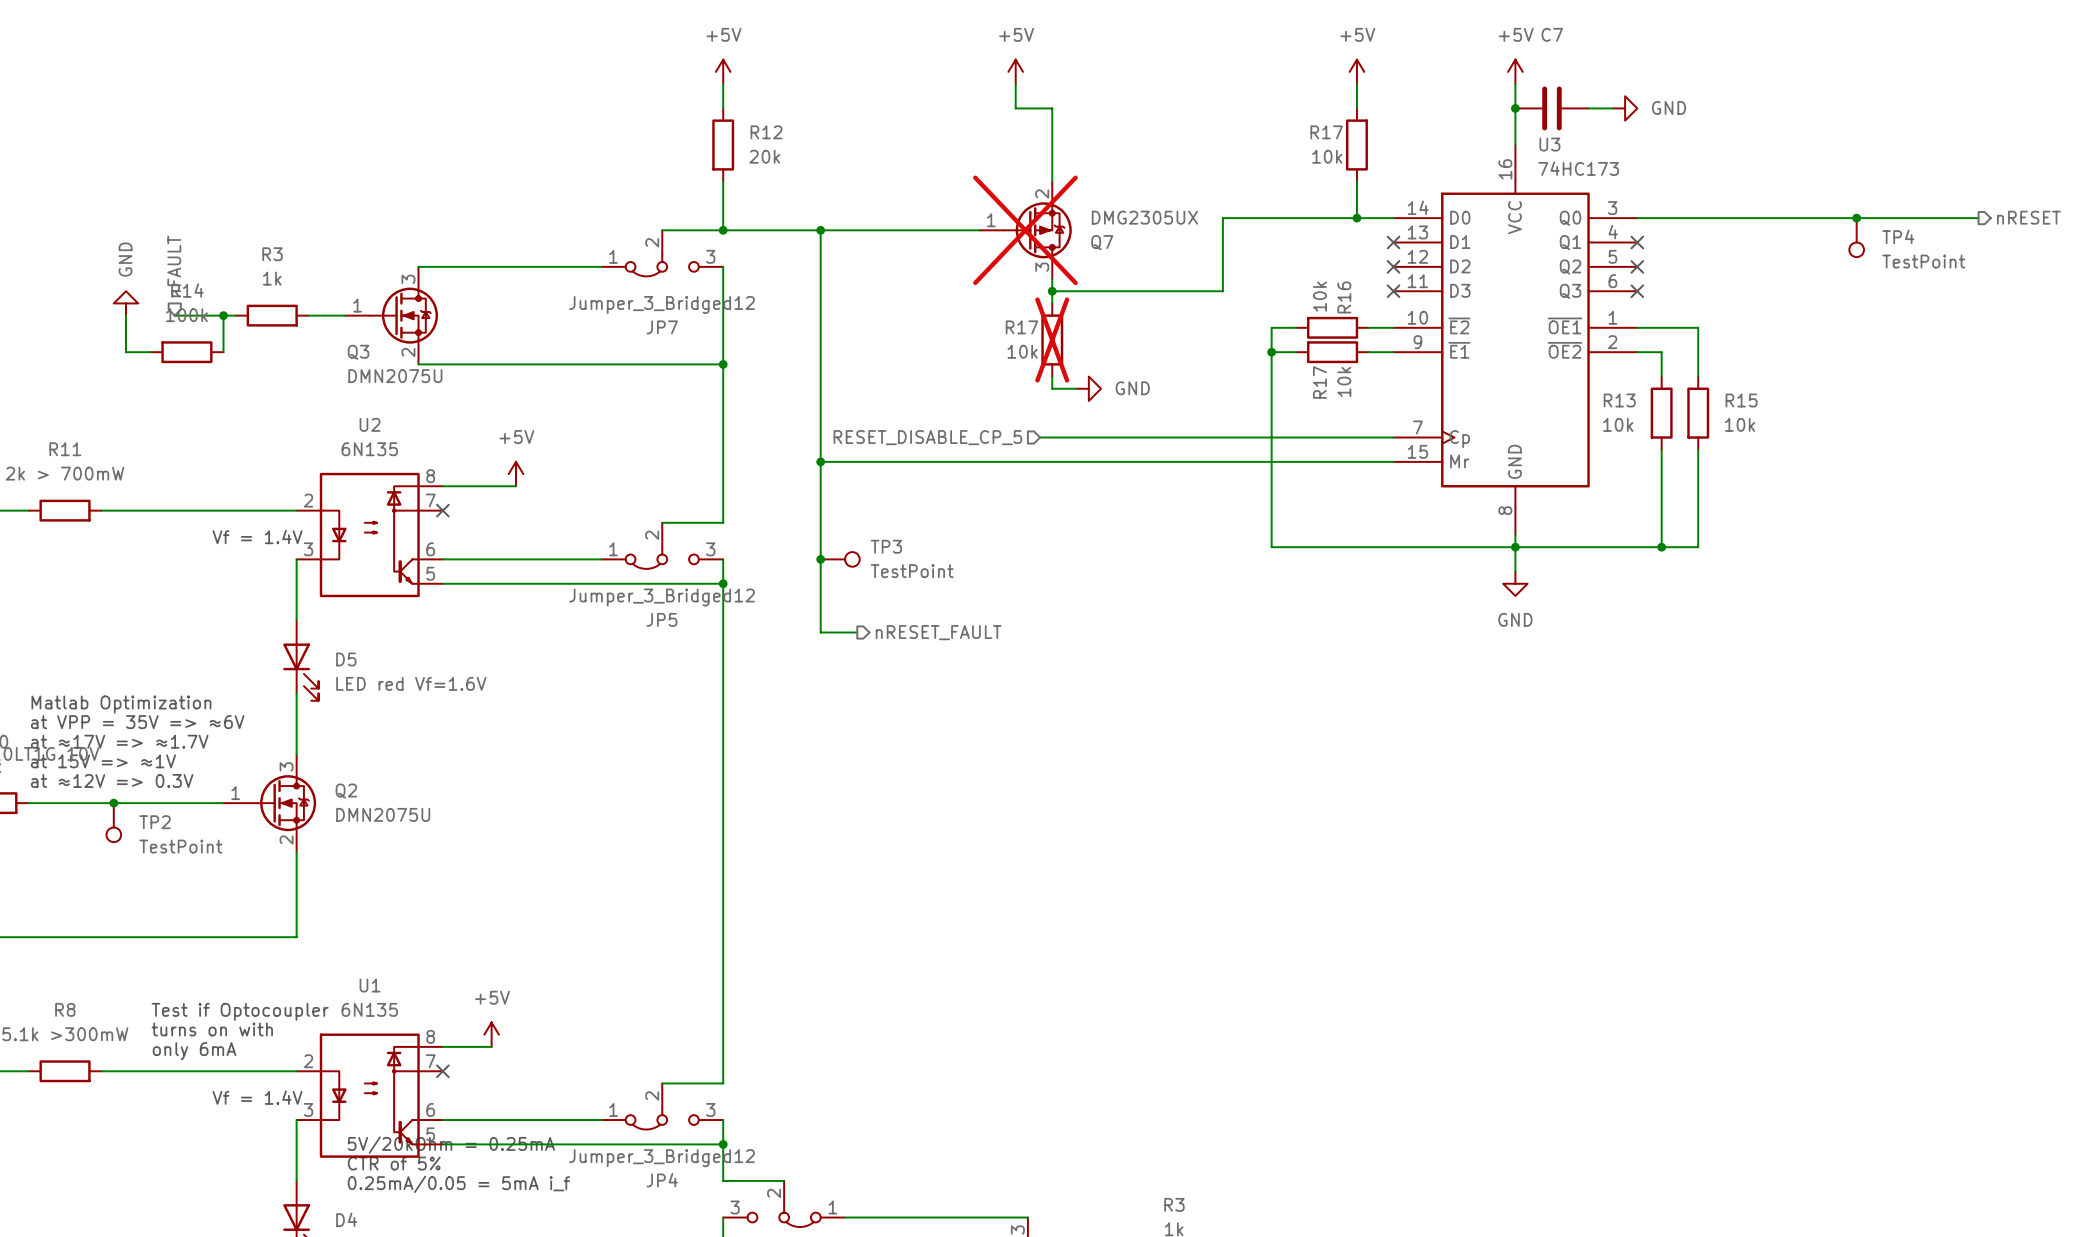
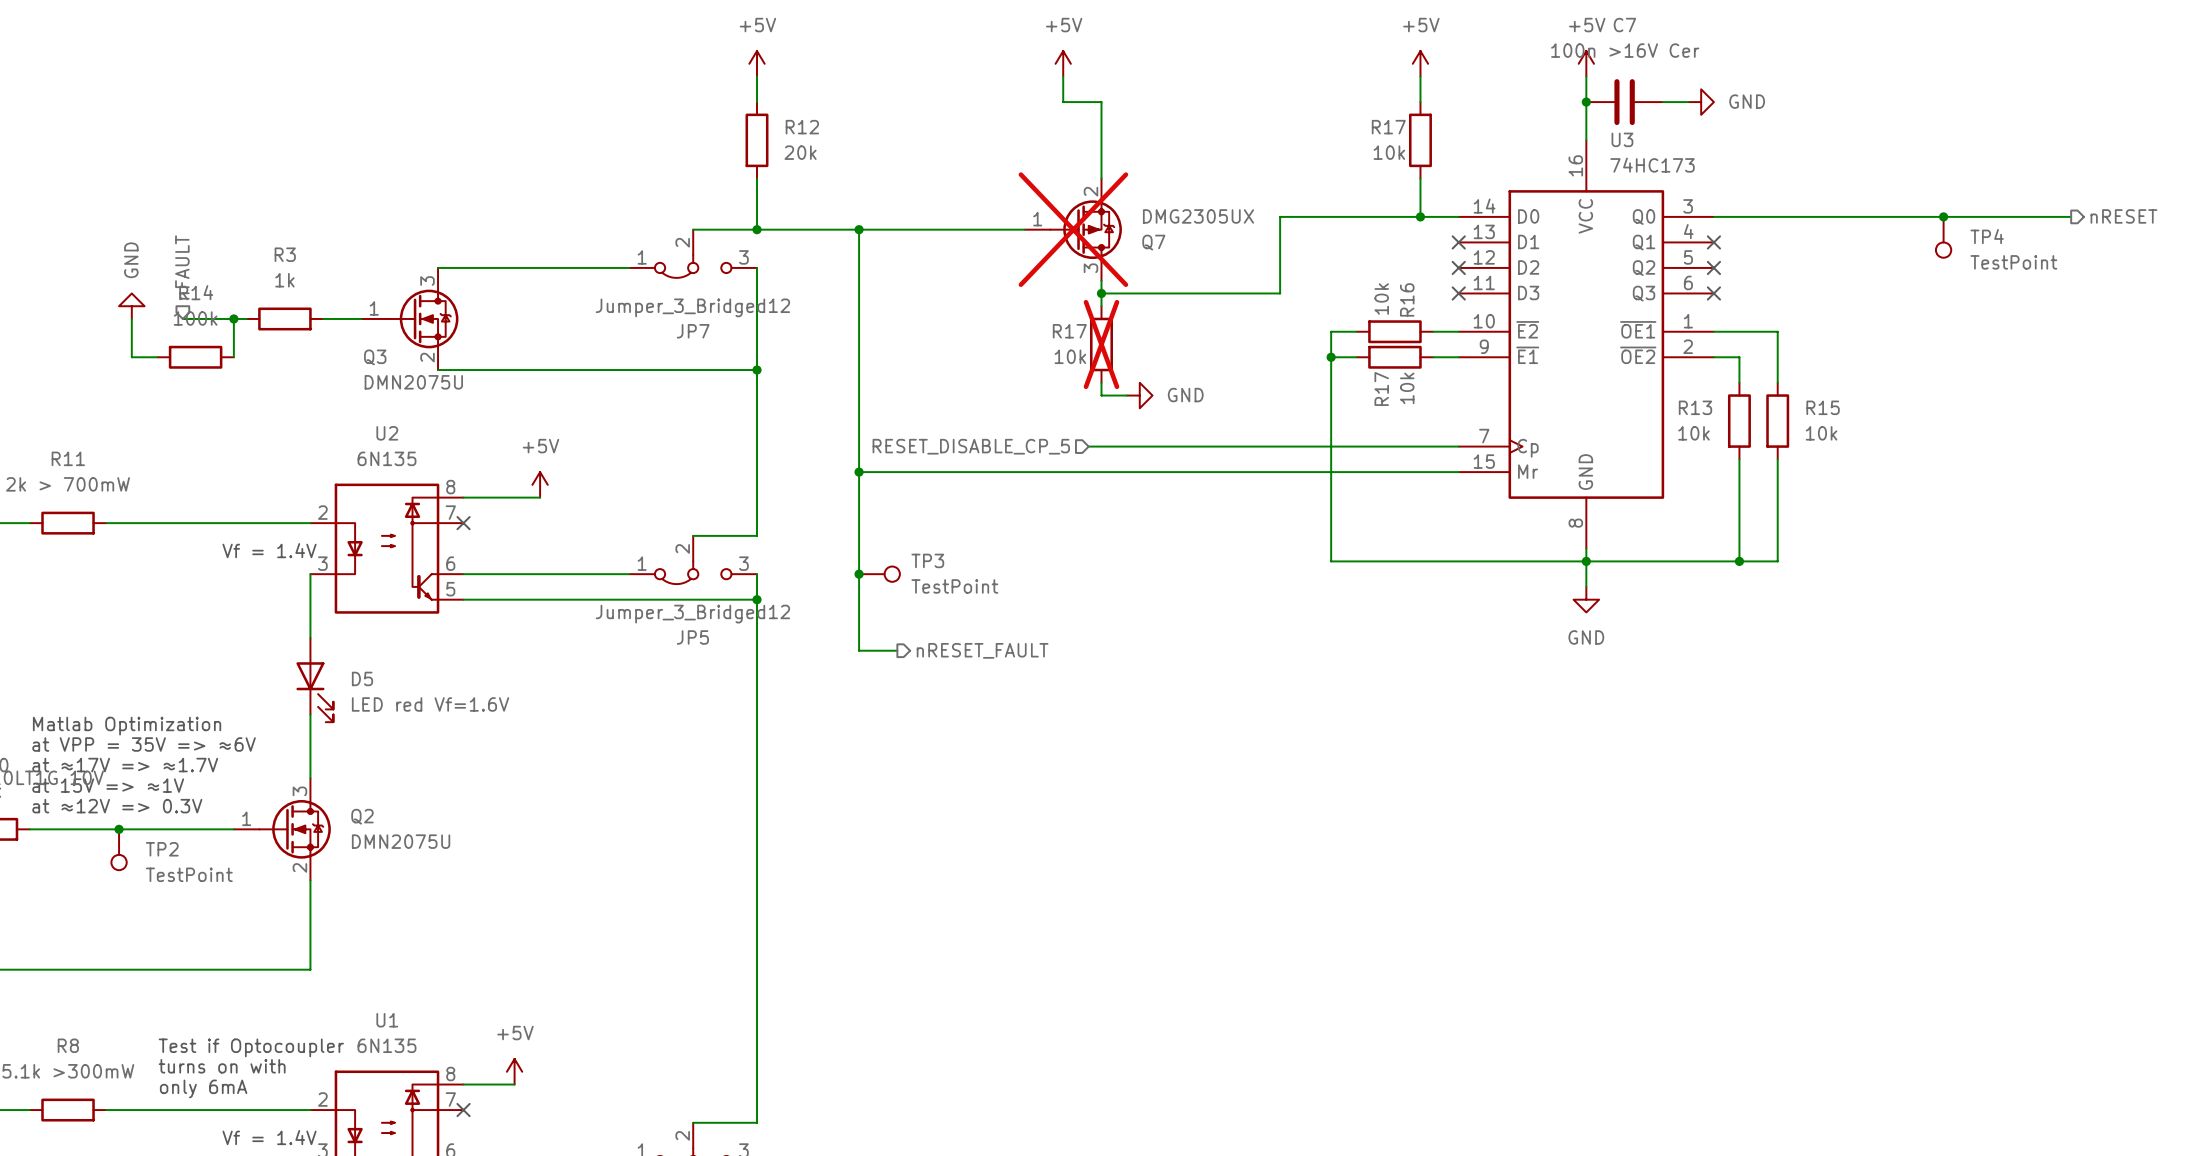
C7 value: none -> 100n >16V Cer (1625, 50)

